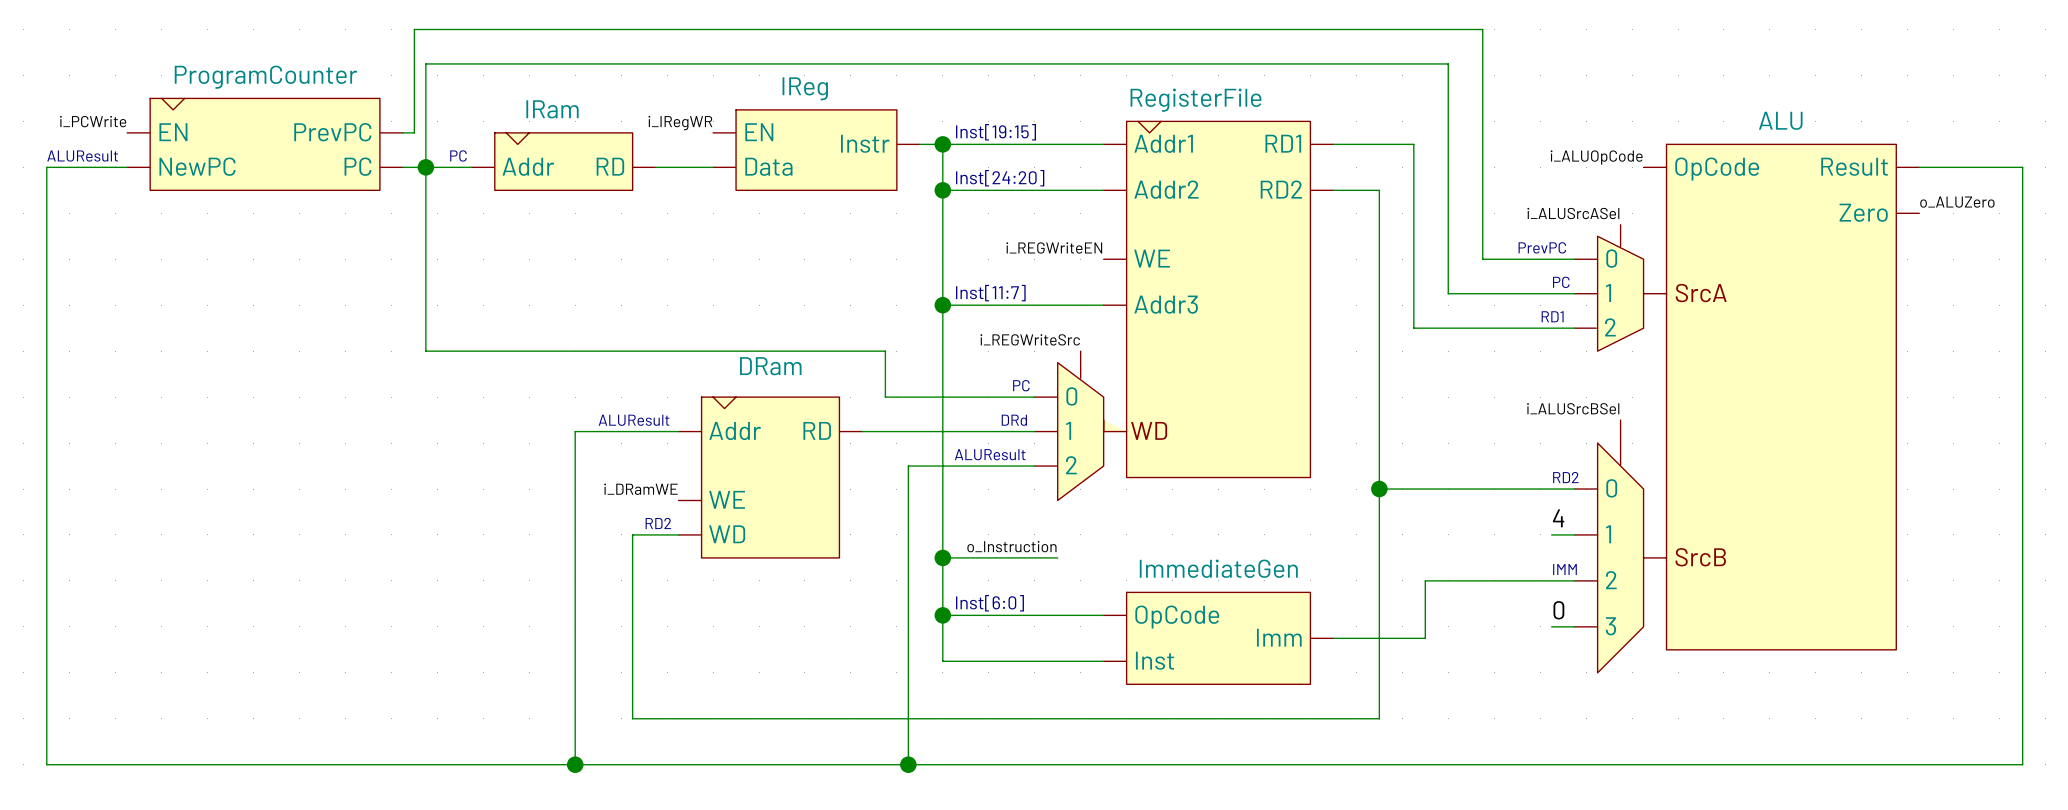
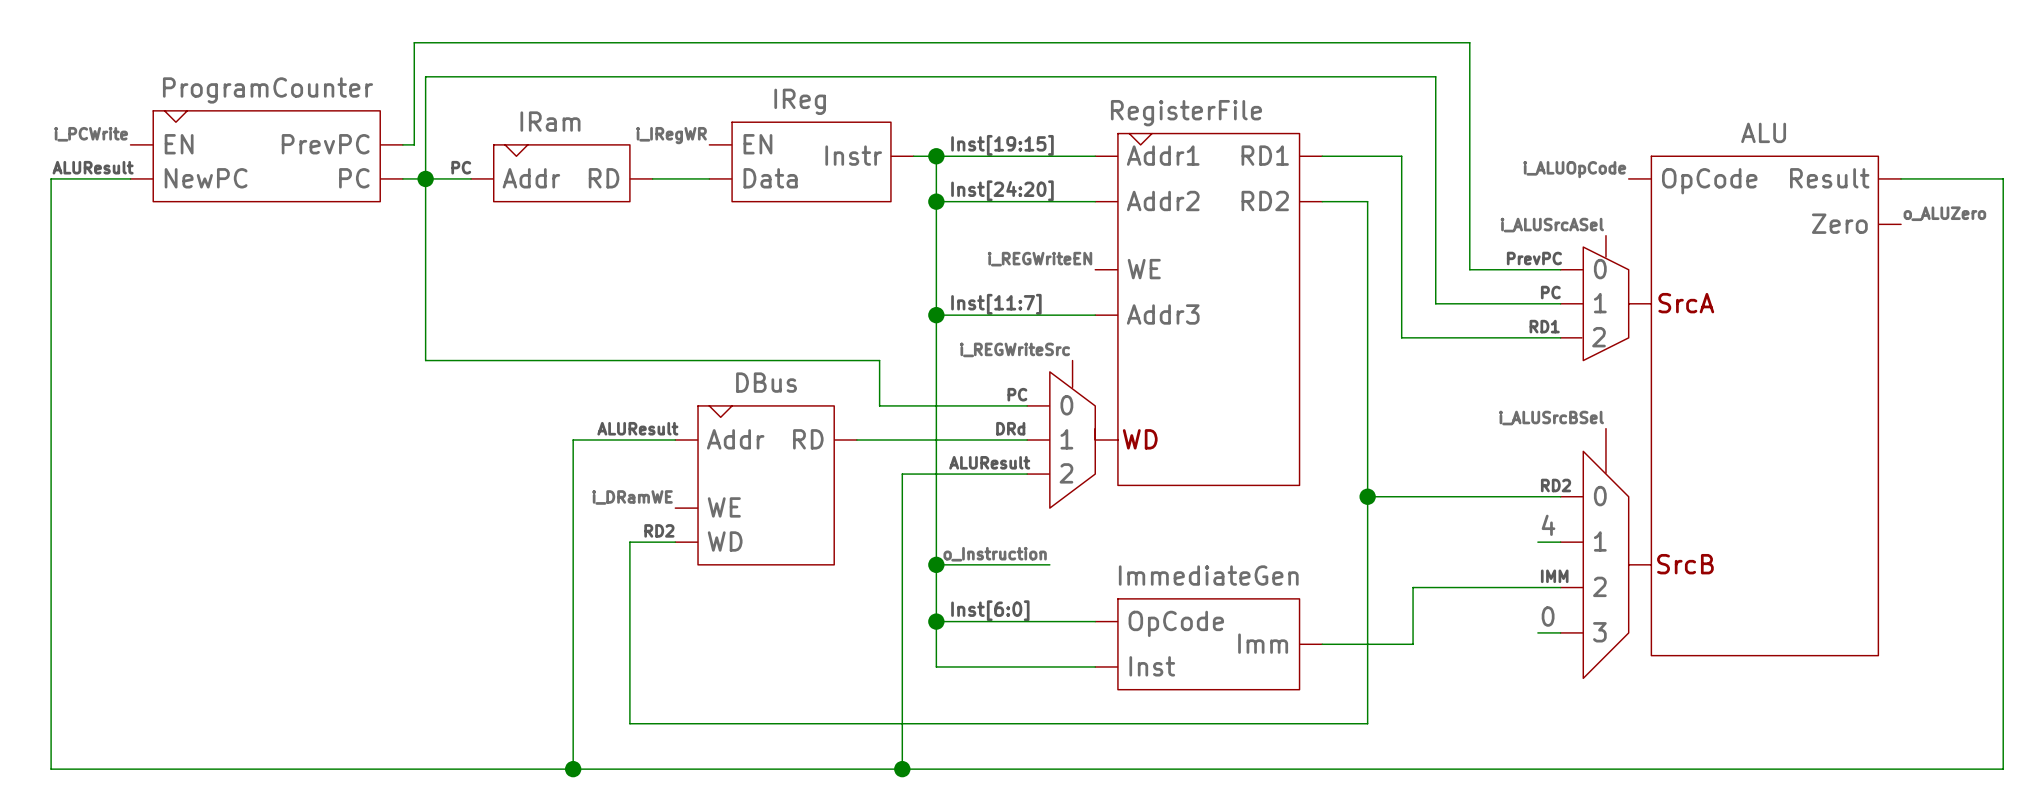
part value: DRam (770, 366) -> DBus (766, 382)

